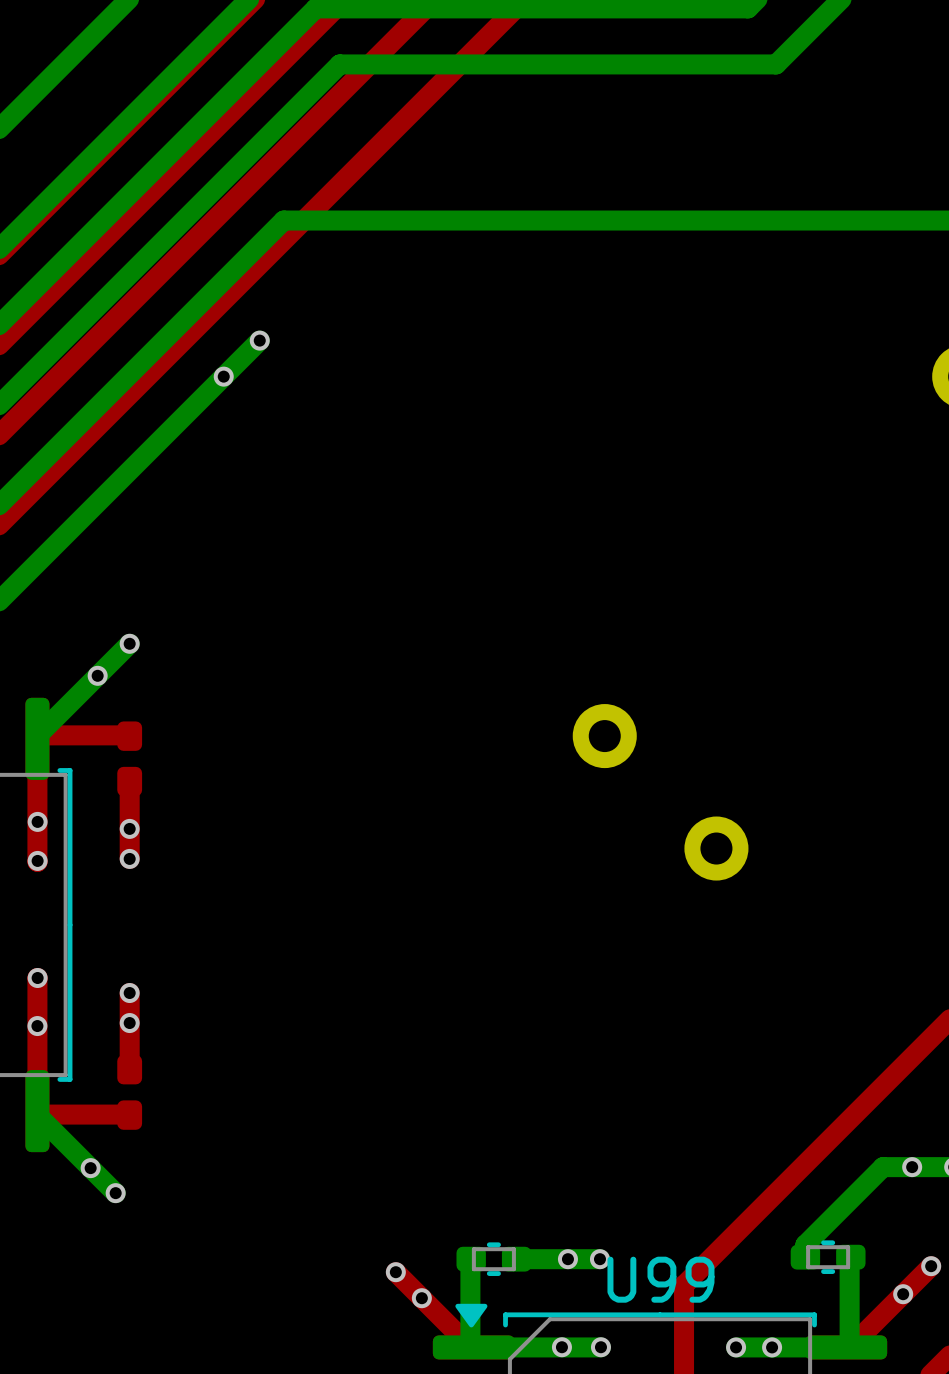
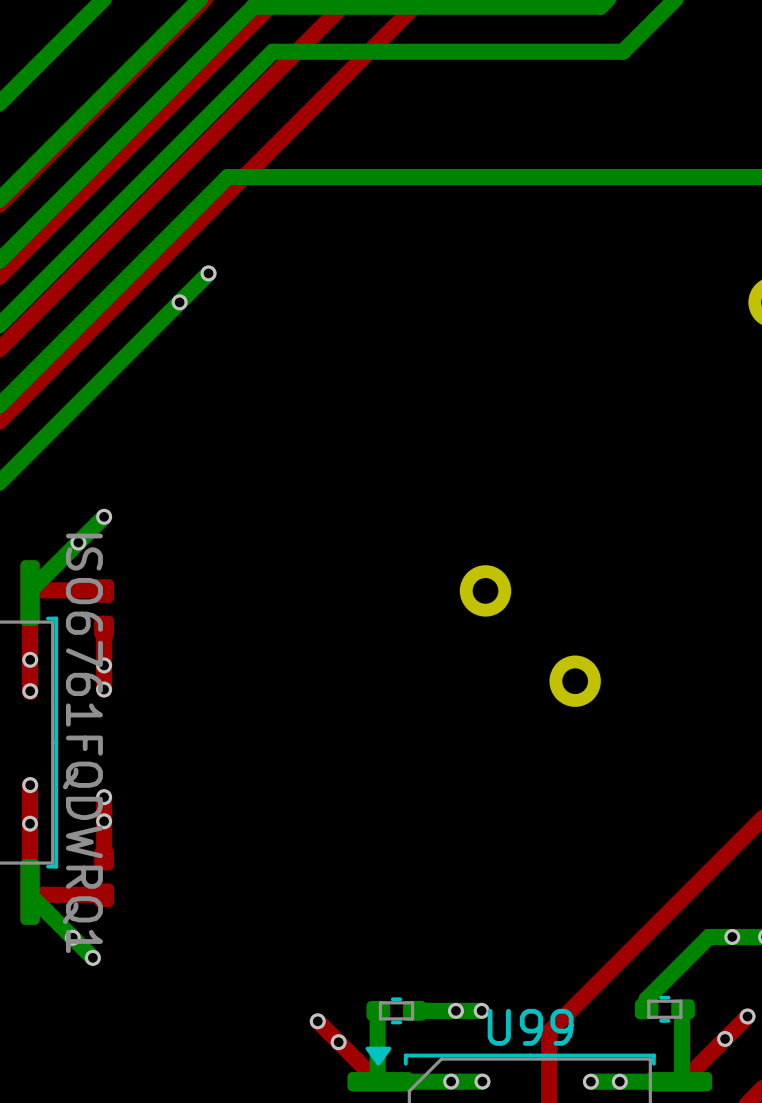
part value: none -> ISO6761FQDWRQ1 (82, 743)

